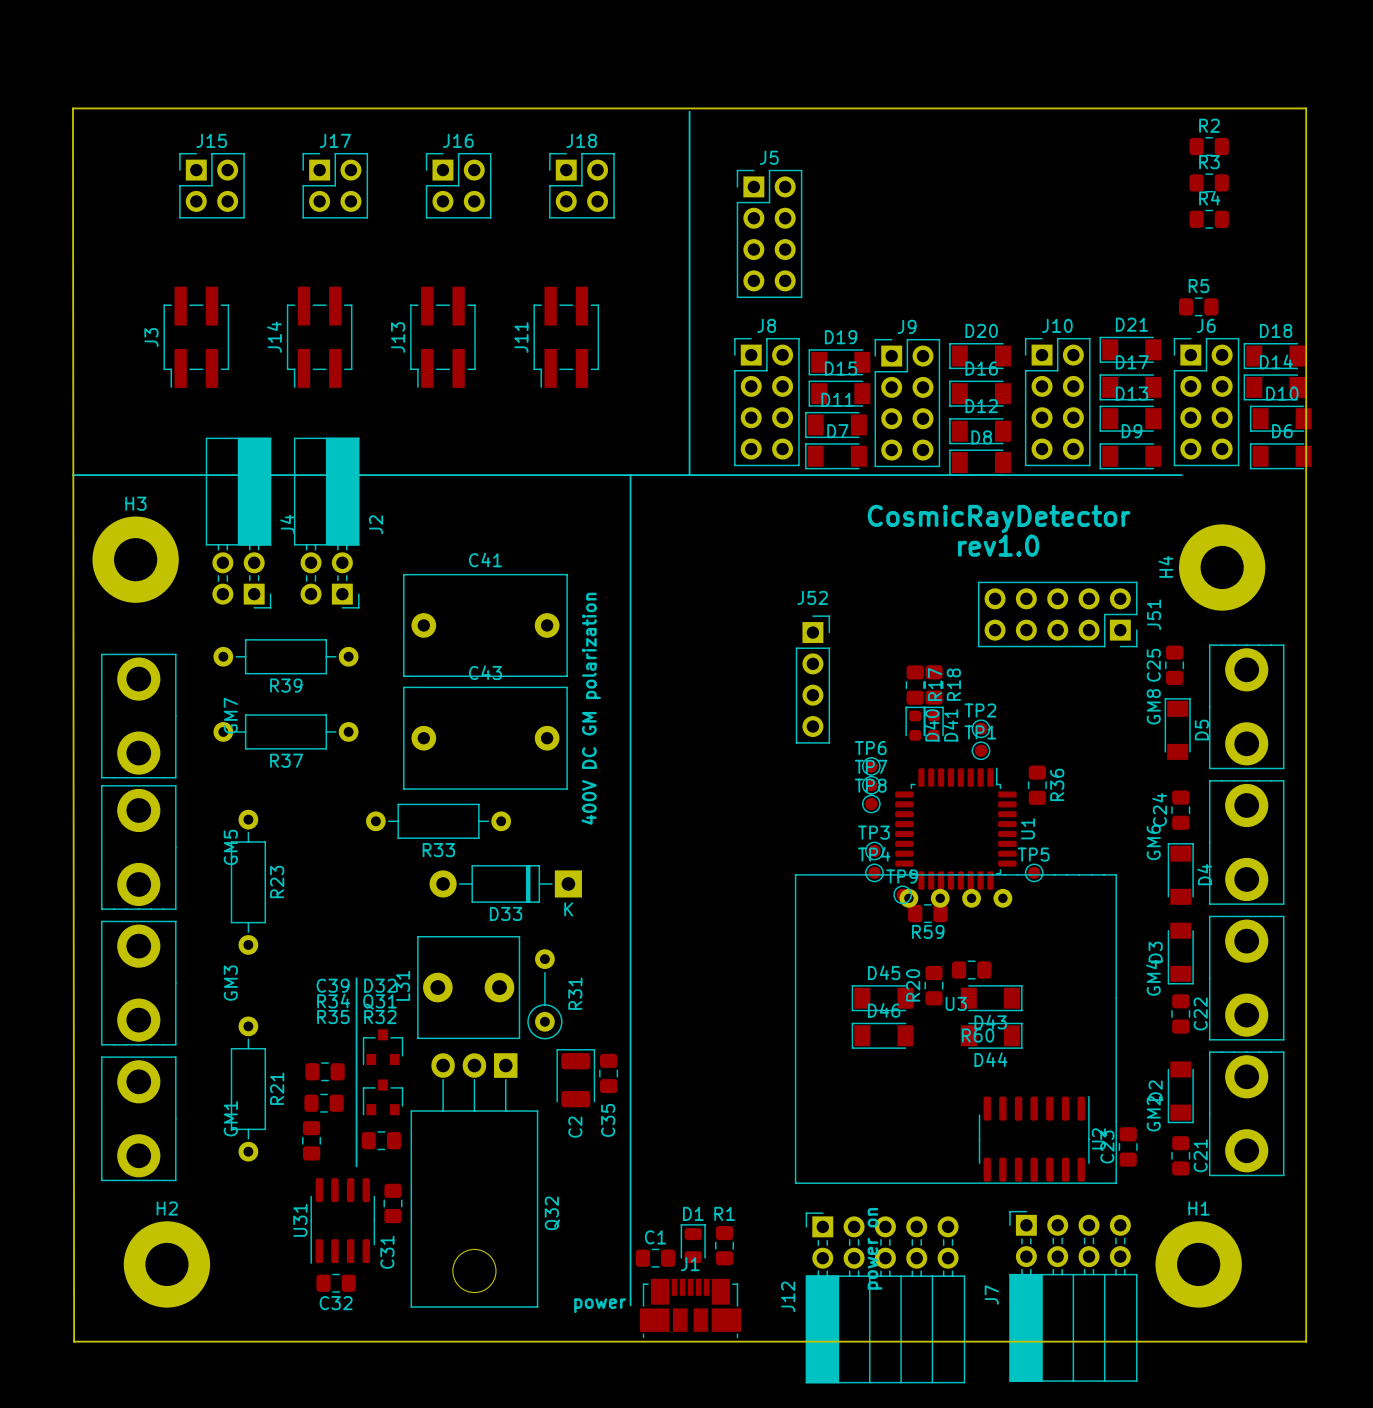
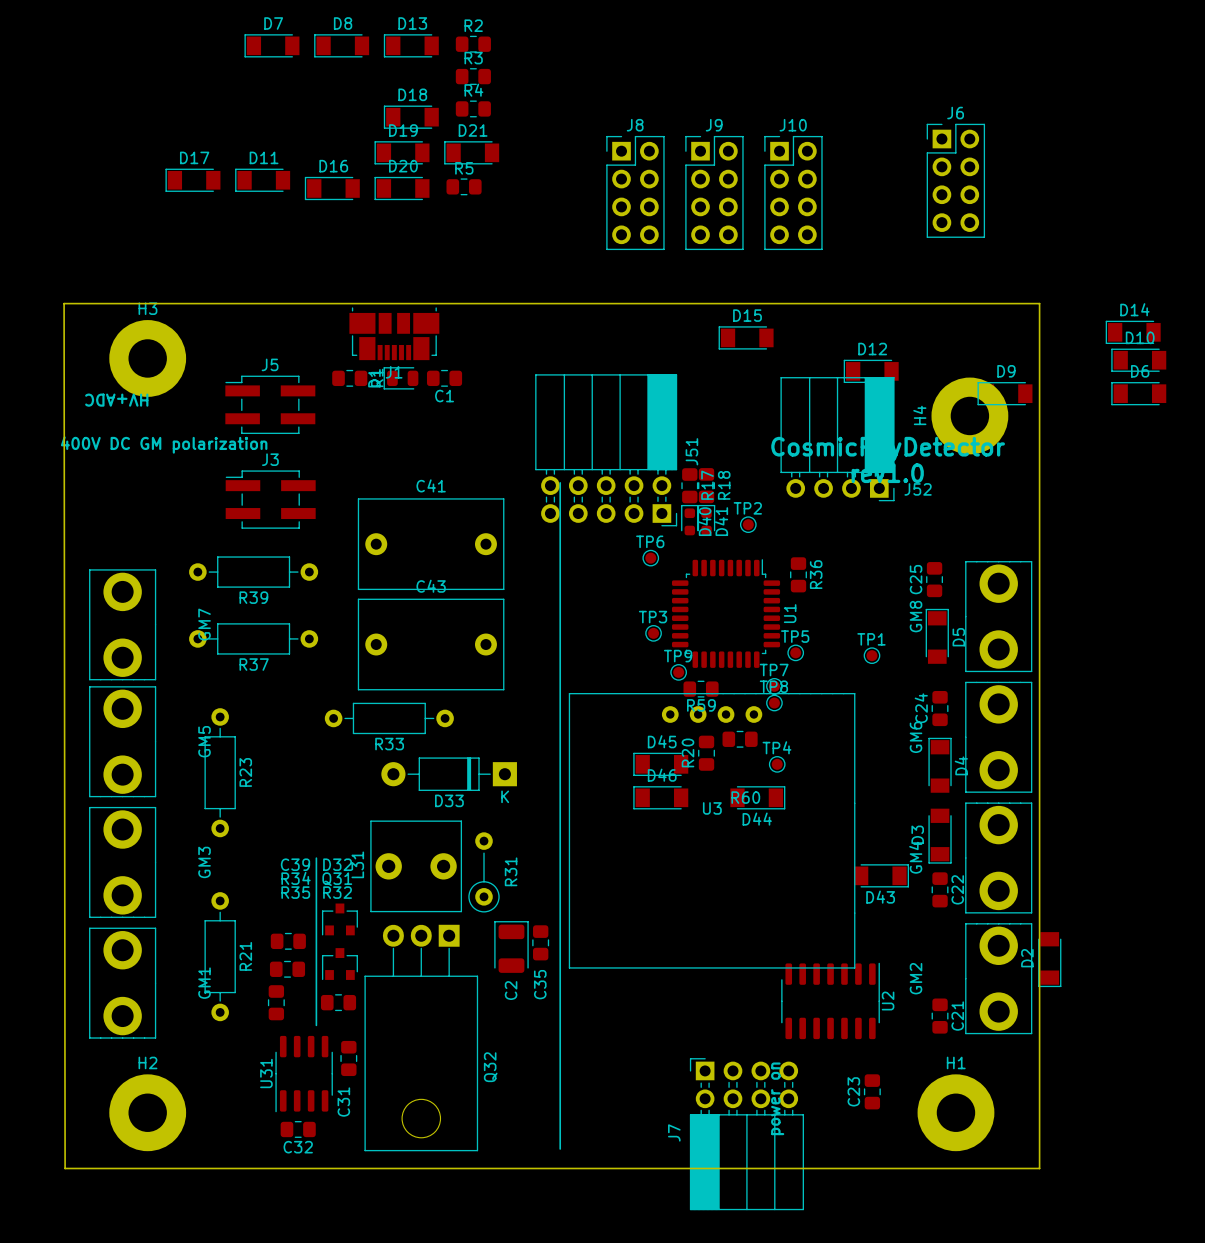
board edge: (72, 108) (1306, 108) (1306, 1341) (74, 1341) (72, 108) -> (64, 303) (65, 1168) (1039, 1168) (1039, 303) (64, 303)
line: (689, 111) (689, 475) -> none
R2 position: (1209, 146) -> (473, 44)
J5 name position: J5 (769, 157) -> J5 (270, 364)
J5 footprint: [736, 169, 803, 299] -> [225, 375, 316, 435]
R3 position: (1209, 182) -> (473, 76)
J15: (211, 185) -> none
J17: (335, 185) -> none
J16: (458, 185) -> none
J18: (581, 185) -> none
R4 position: (1209, 219) -> (473, 108)
R5 position: (1198, 306) -> (464, 186)
J3 rotation: 0° (196, 337) -> 90° clockwise (270, 499)
J3 position: (196, 337) -> (270, 499)
J14: (319, 337) -> none
J13: (442, 337) -> none
J11: (566, 337) -> none
D21 position: (1130, 349) -> (471, 152)
D20 position: (980, 356) -> (402, 188)
D18 position: (1274, 356) -> (411, 117)
D19 position: (839, 362) -> (402, 152)
D17 position: (1130, 387) -> (192, 180)
D16 position: (980, 393) -> (332, 188)
J8 position: (766, 402) -> (635, 193)
J10 position: (1057, 402) -> (793, 193)
J6 position: (1206, 402) -> (955, 180)
J9 position: (907, 403) -> (714, 193)
D13 position: (1130, 418) -> (411, 45)
D11 position: (835, 424) -> (262, 180)
D7 position: (835, 456) -> (271, 45)
D8 position: (980, 462) -> (341, 45)
text: none -> HV+ADC (116, 400)
line: (72, 475) (1181, 475) -> none
line: (630, 475) (630, 556) -> none
text: none -> 400V DC GM polarization (164, 445)
J4: (238, 523) -> none
J2: (326, 523) -> none
H3 position: (135, 559) -> (147, 358)
H4 position: (1222, 567) -> (969, 415)
J51 footprint: [977, 581, 1138, 648] -> [535, 374, 678, 527]
J52 name position: J52 (812, 597) -> J52 (918, 489)
J52 footprint: [795, 615, 831, 744] -> [780, 377, 895, 502]
C25 position: (1174, 665) -> (934, 579)
R18 position: (933, 684) -> (706, 485)
R17 position: (915, 685) -> (689, 485)
GM8 position: (1246, 706) -> (998, 616)
text: 400V DC GM polarization (591, 708) -> none
D40 position: (915, 723) -> (689, 520)
D41 position: (933, 723) -> (706, 520)
TP2 position: (980, 728) -> (748, 524)
D5 position: (1177, 729) -> (937, 636)
TP6 position: (871, 766) -> (650, 558)
R36 position: (1037, 785) -> (798, 574)
C24 position: (1180, 810) -> (940, 708)
U1 position: (955, 828) -> (726, 613)
GM6 position: (1246, 842) -> (998, 737)
TP3 position: (874, 850) -> (653, 633)
TP5 position: (1034, 872) -> (795, 652)
D4 position: (1180, 873) -> (940, 765)
TP9 position: (902, 894) -> (678, 672)
R59 position: (927, 913) -> (701, 689)
D3 position: (1180, 953) -> (940, 836)
R60 position: (971, 970) -> (740, 739)
GM4 position: (1246, 978) -> (998, 857)
R20 position: (933, 985) -> (706, 753)
D45 position: (882, 998) -> (660, 764)
C22 position: (1180, 1013) -> (940, 889)
U3 position: (955, 1029) -> (712, 830)
D46 position: (882, 1035) -> (660, 797)
D44 position: (991, 1035) -> (757, 797)
GM2 position: (1246, 1113) -> (998, 978)
U2 position: (1034, 1138) -> (830, 1000)
C23 position: (1128, 1146) -> (872, 1091)
C21 position: (1180, 1155) -> (940, 1016)
C1 name position: C1 (655, 1237) -> C1 (444, 396)
D1 rotation: 0° (693, 1243) -> 90° counterclockwise (400, 378)
D1 position: (693, 1243) -> (400, 378)
R1 rotation: 0° (724, 1245) -> 90° clockwise (349, 378)
R1 position: (724, 1245) -> (349, 378)
C1 position: (655, 1258) -> (444, 378)
H1 position: (1198, 1264) -> (955, 1112)
J7 position: (1073, 1296) -> (746, 1134)
J12: (885, 1297) -> none
text: power (600, 1305) -> none
J1 rotation: 0° (690, 1308) -> 180° (394, 333)
J1 position: (690, 1308) -> (394, 333)

